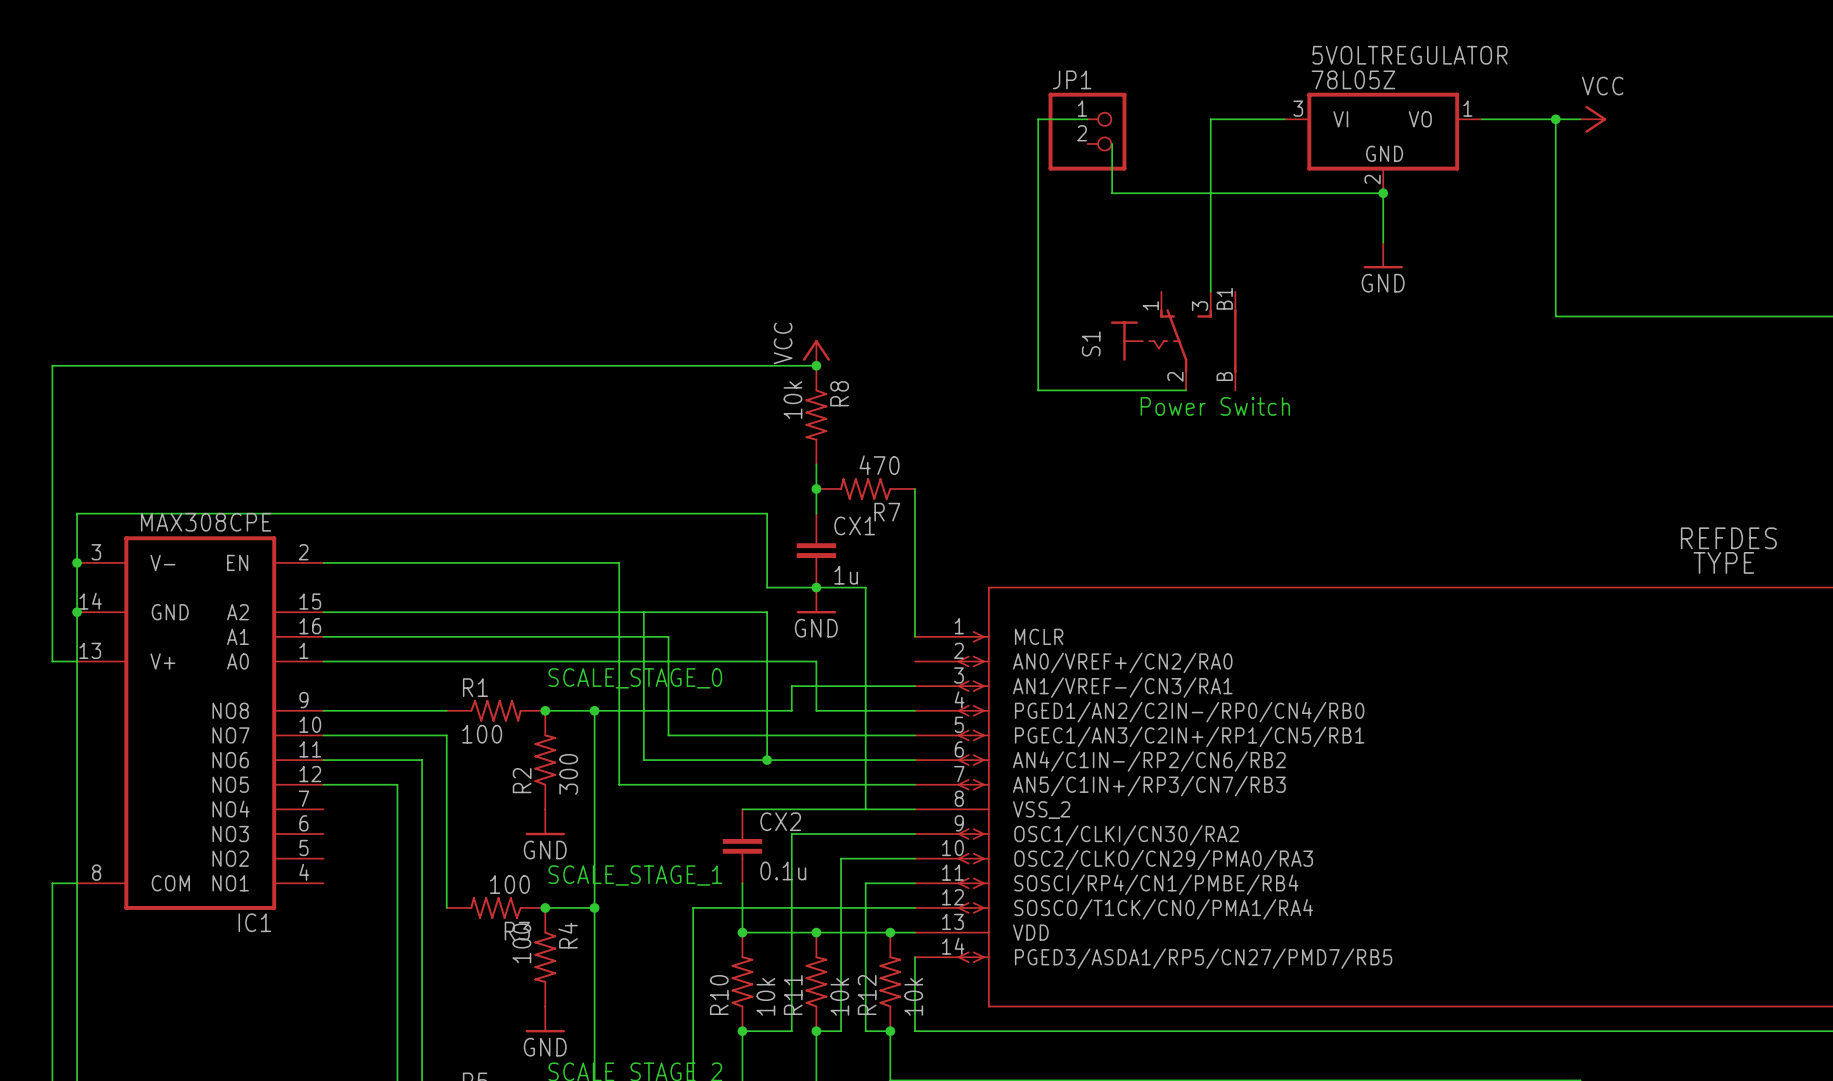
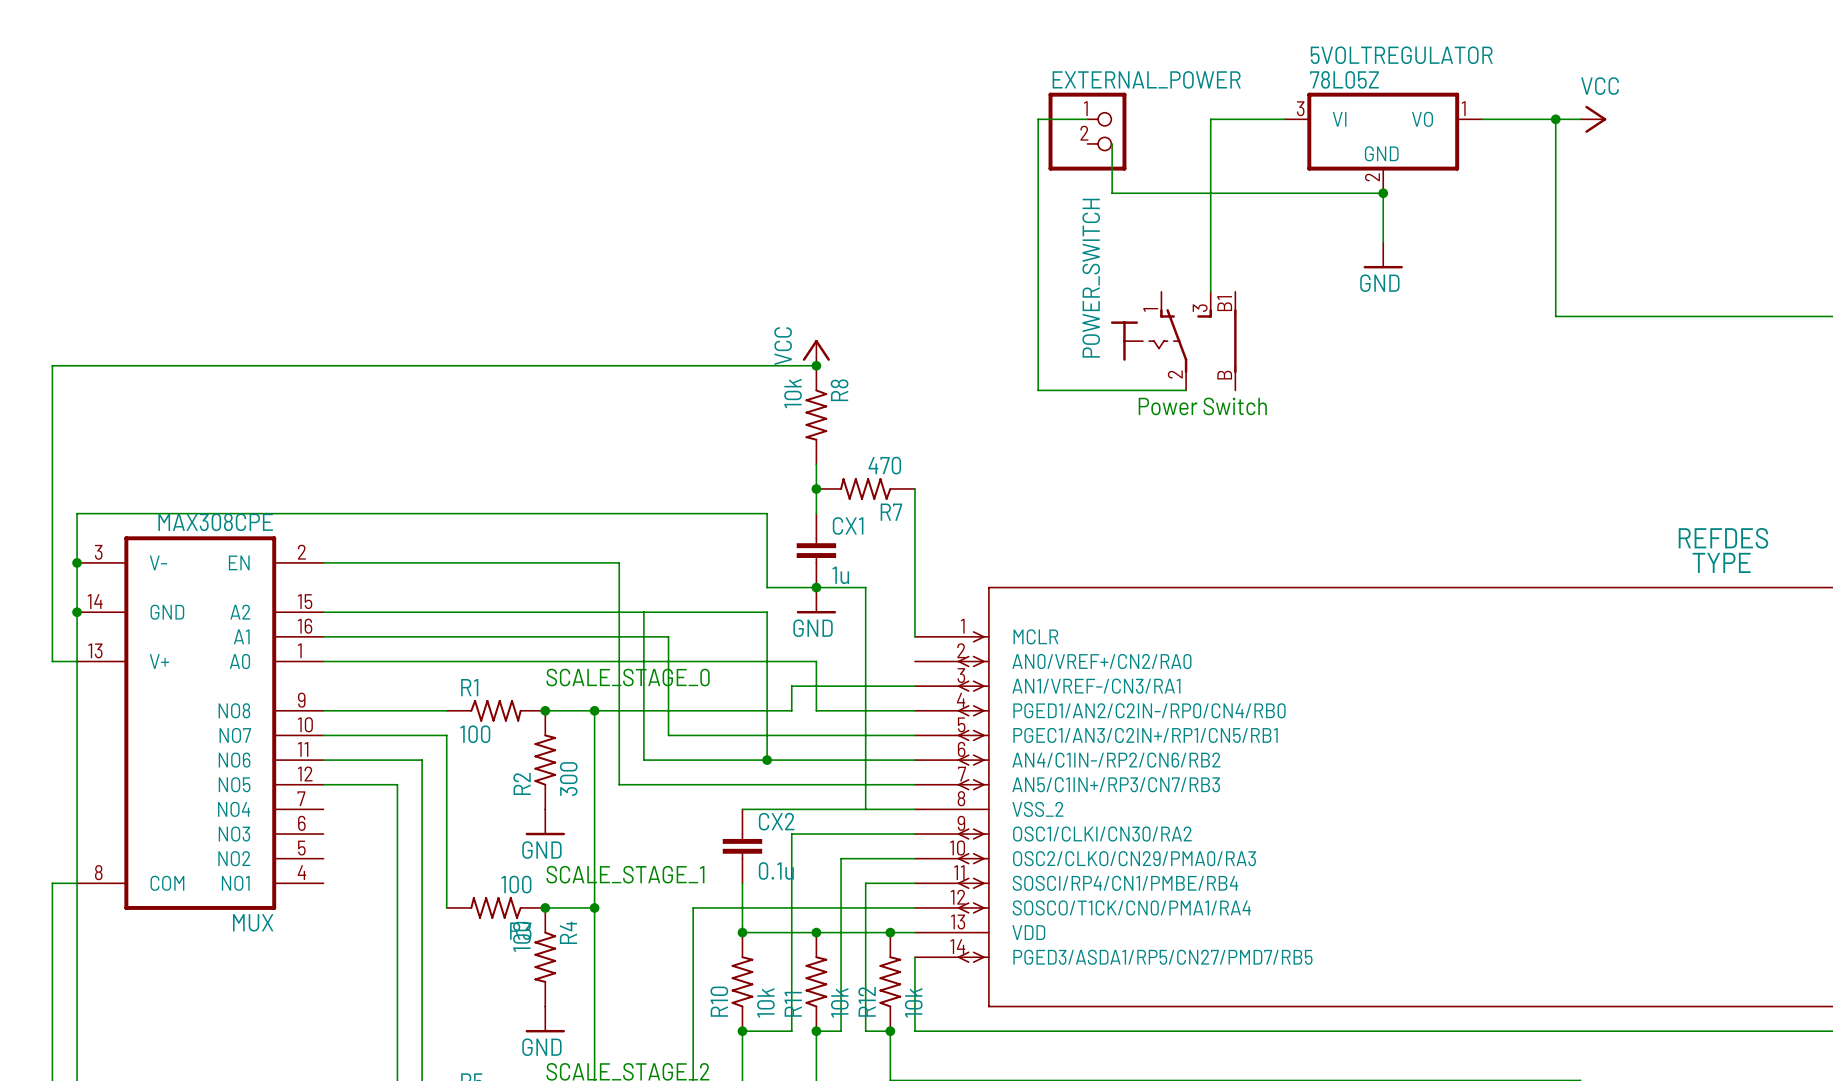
JP1 name: JP1 (1072, 79) -> EXTERNAL_POWER (1146, 79)
S1 name: S1 (1091, 343) -> POWER_SWITCH (1091, 278)
IC1 name: IC1 (254, 922) -> MUX (253, 922)

